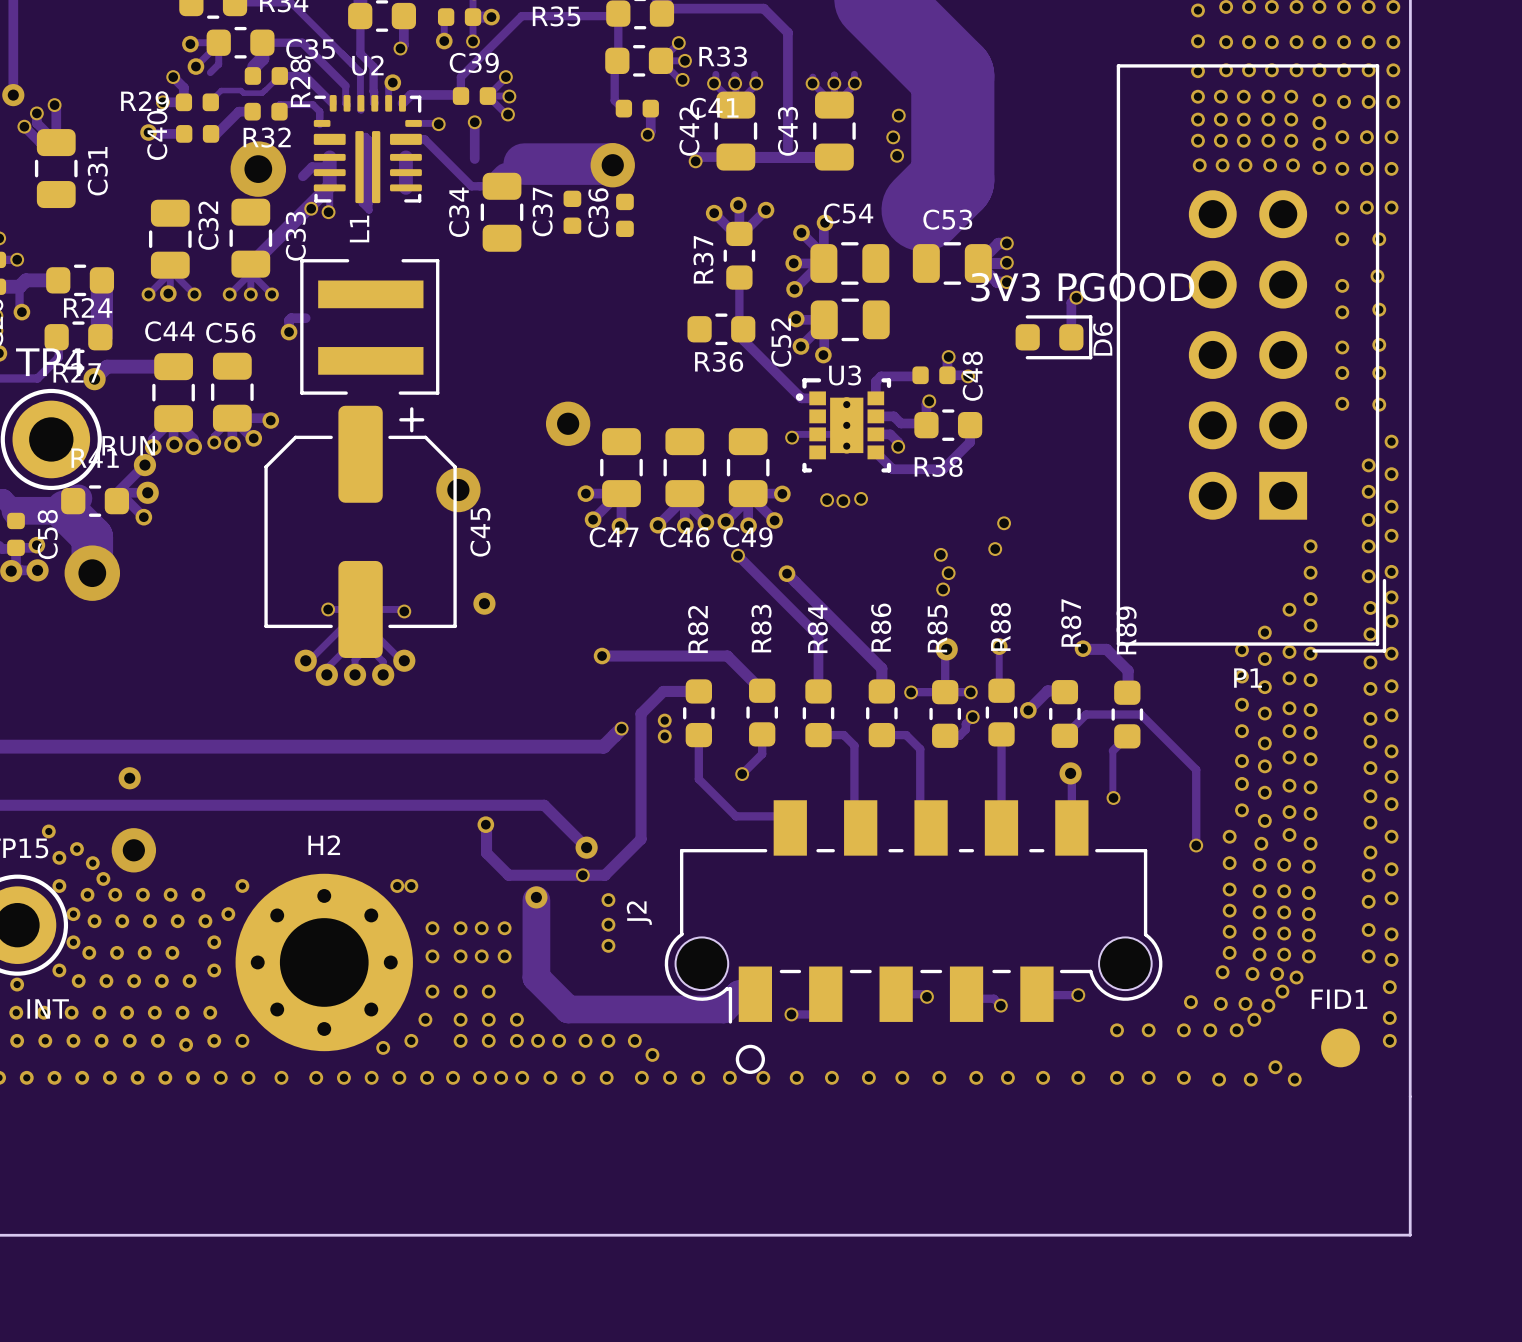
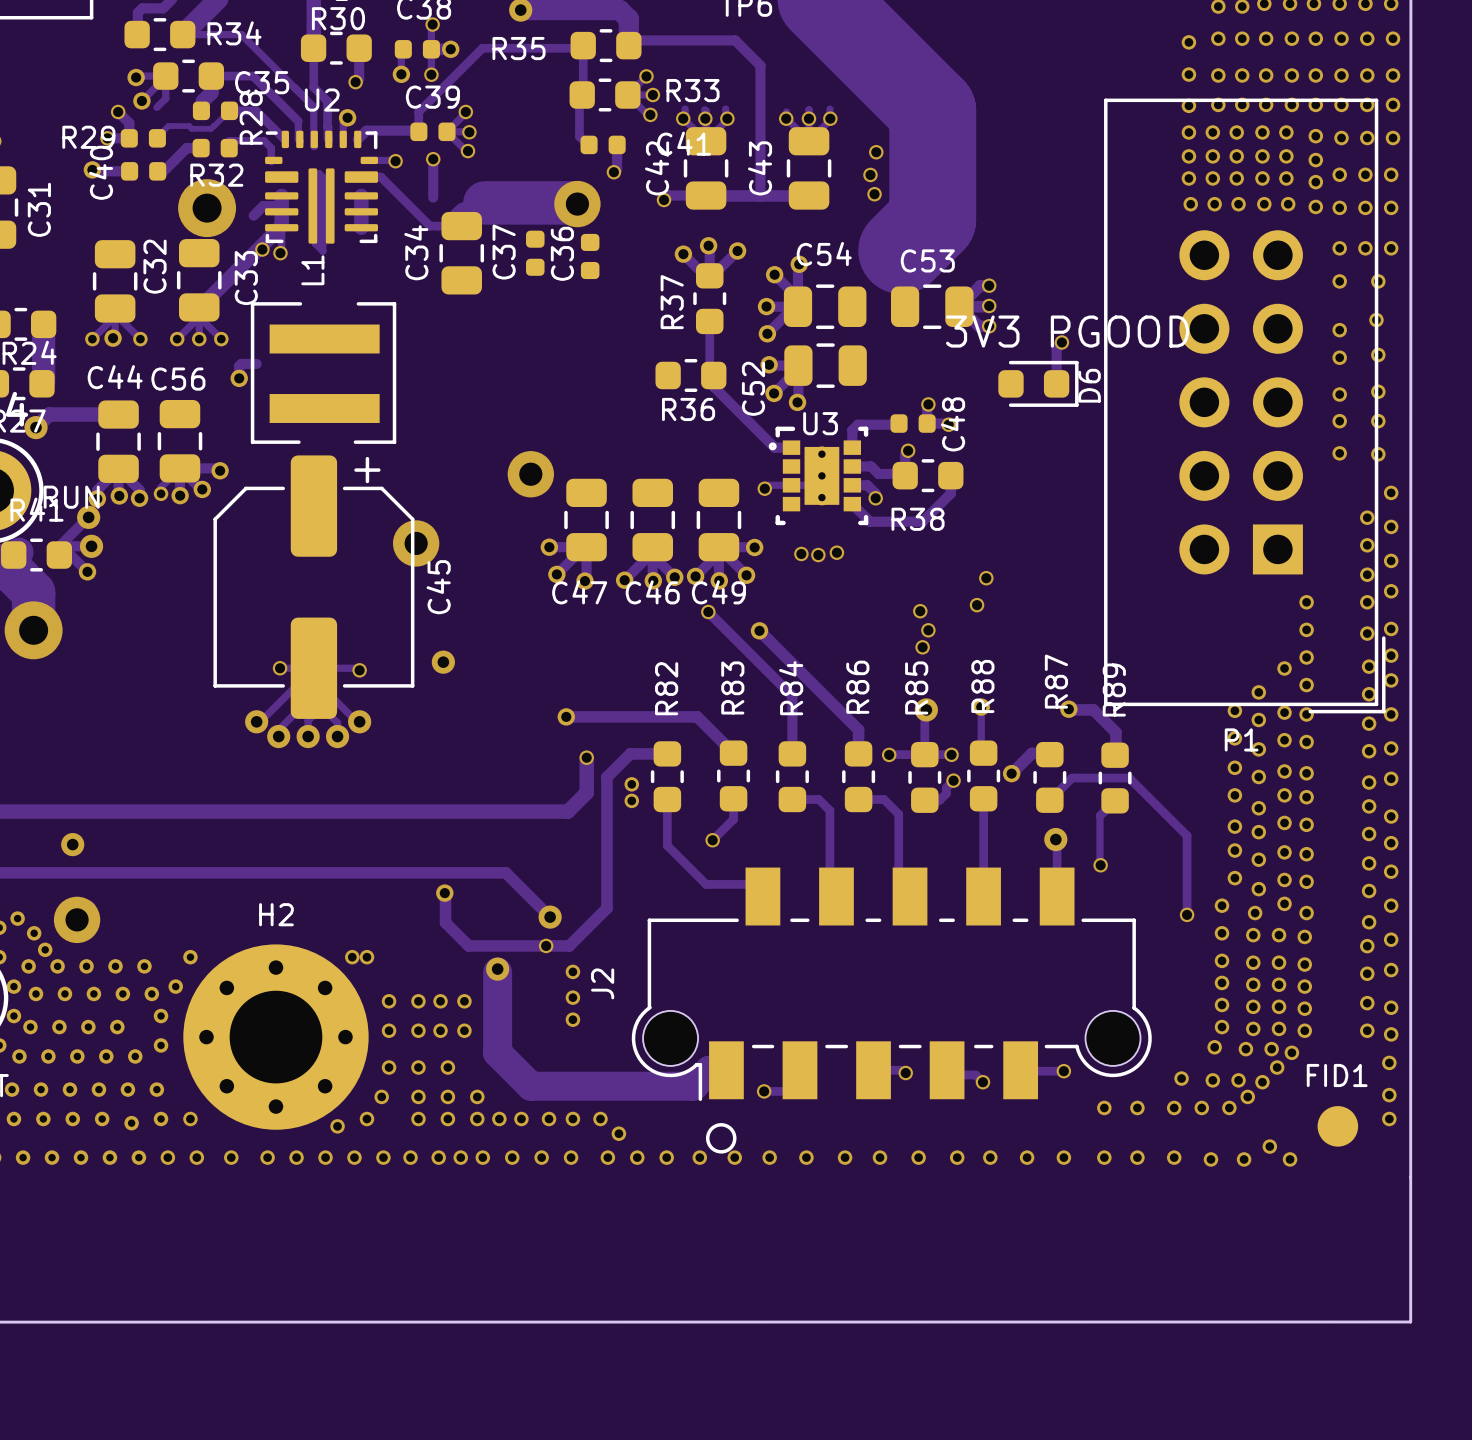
track: none -> (586, 757) (586, 792)
via position: (621, 728) -> (586, 757)

